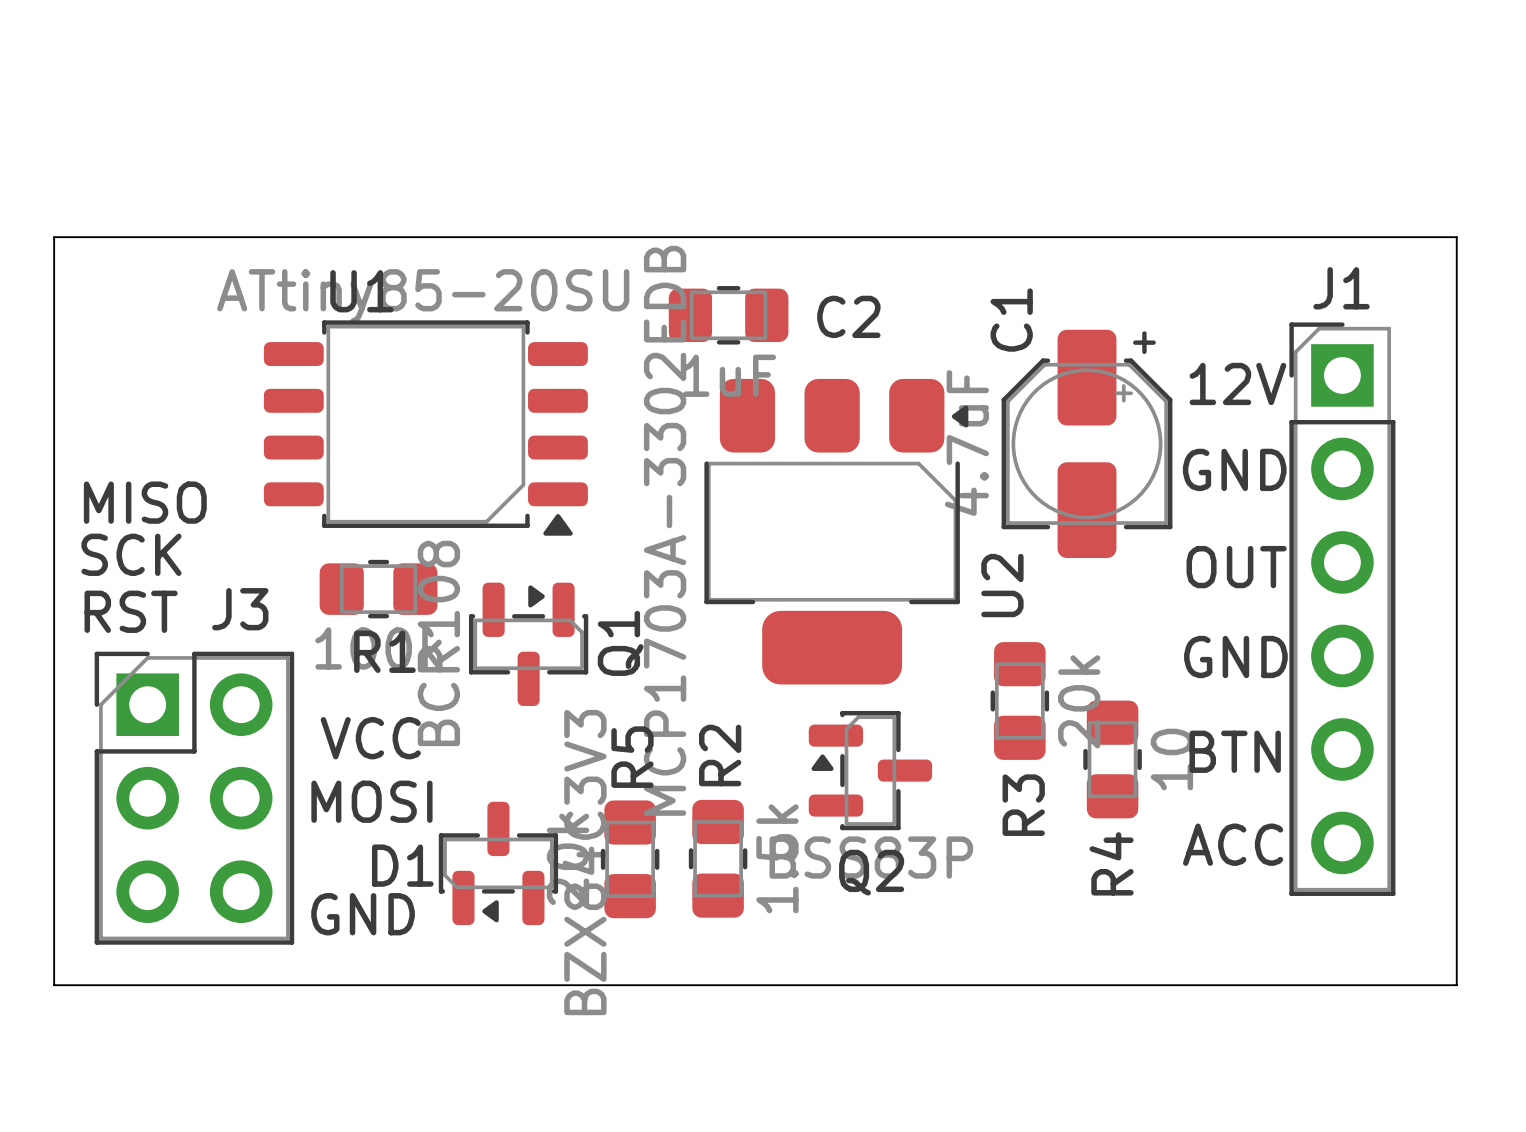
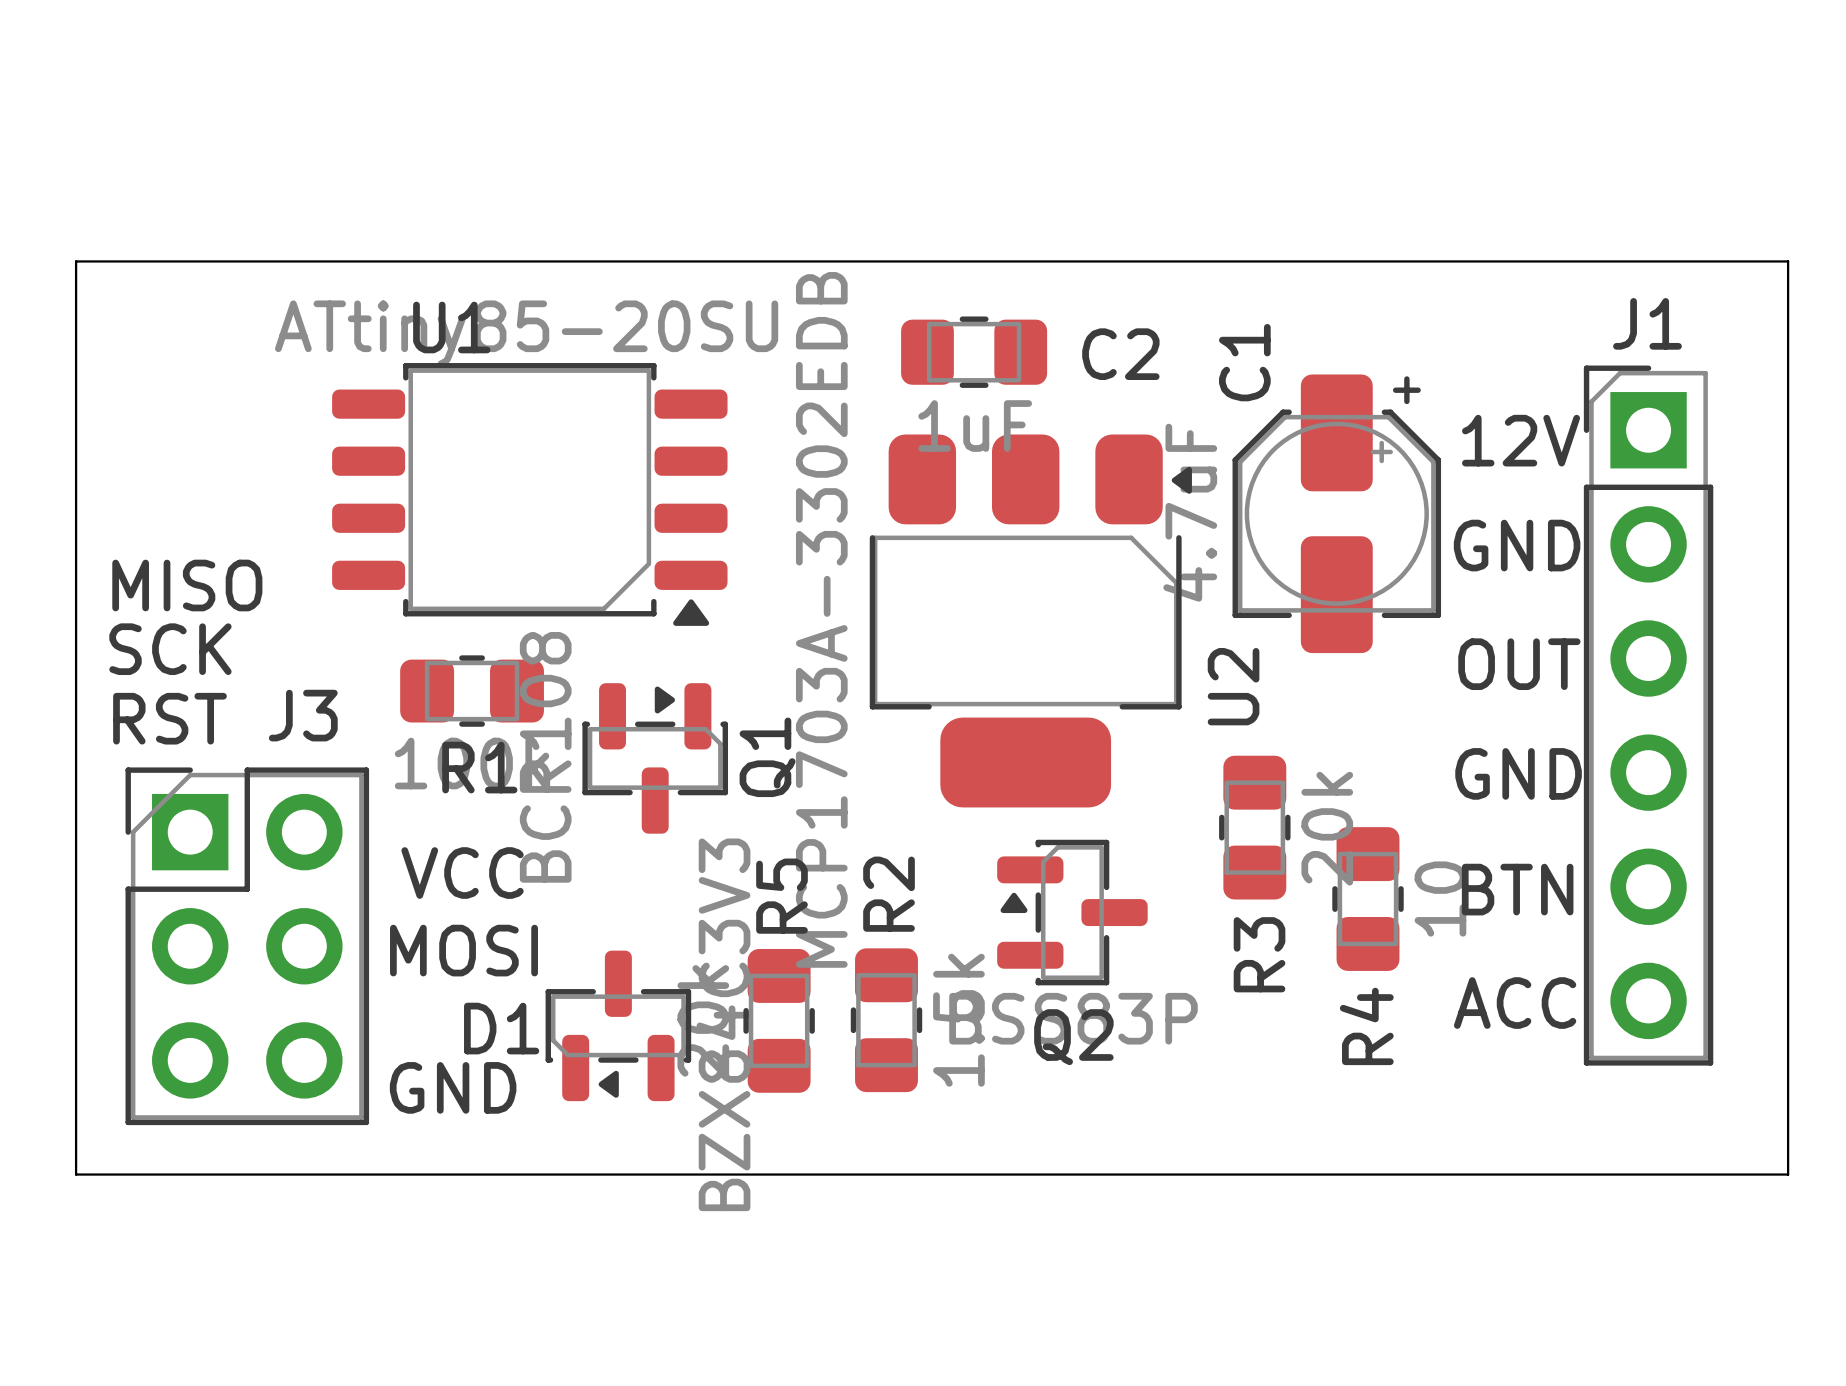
C2 position: (728, 315) -> (974, 352)

